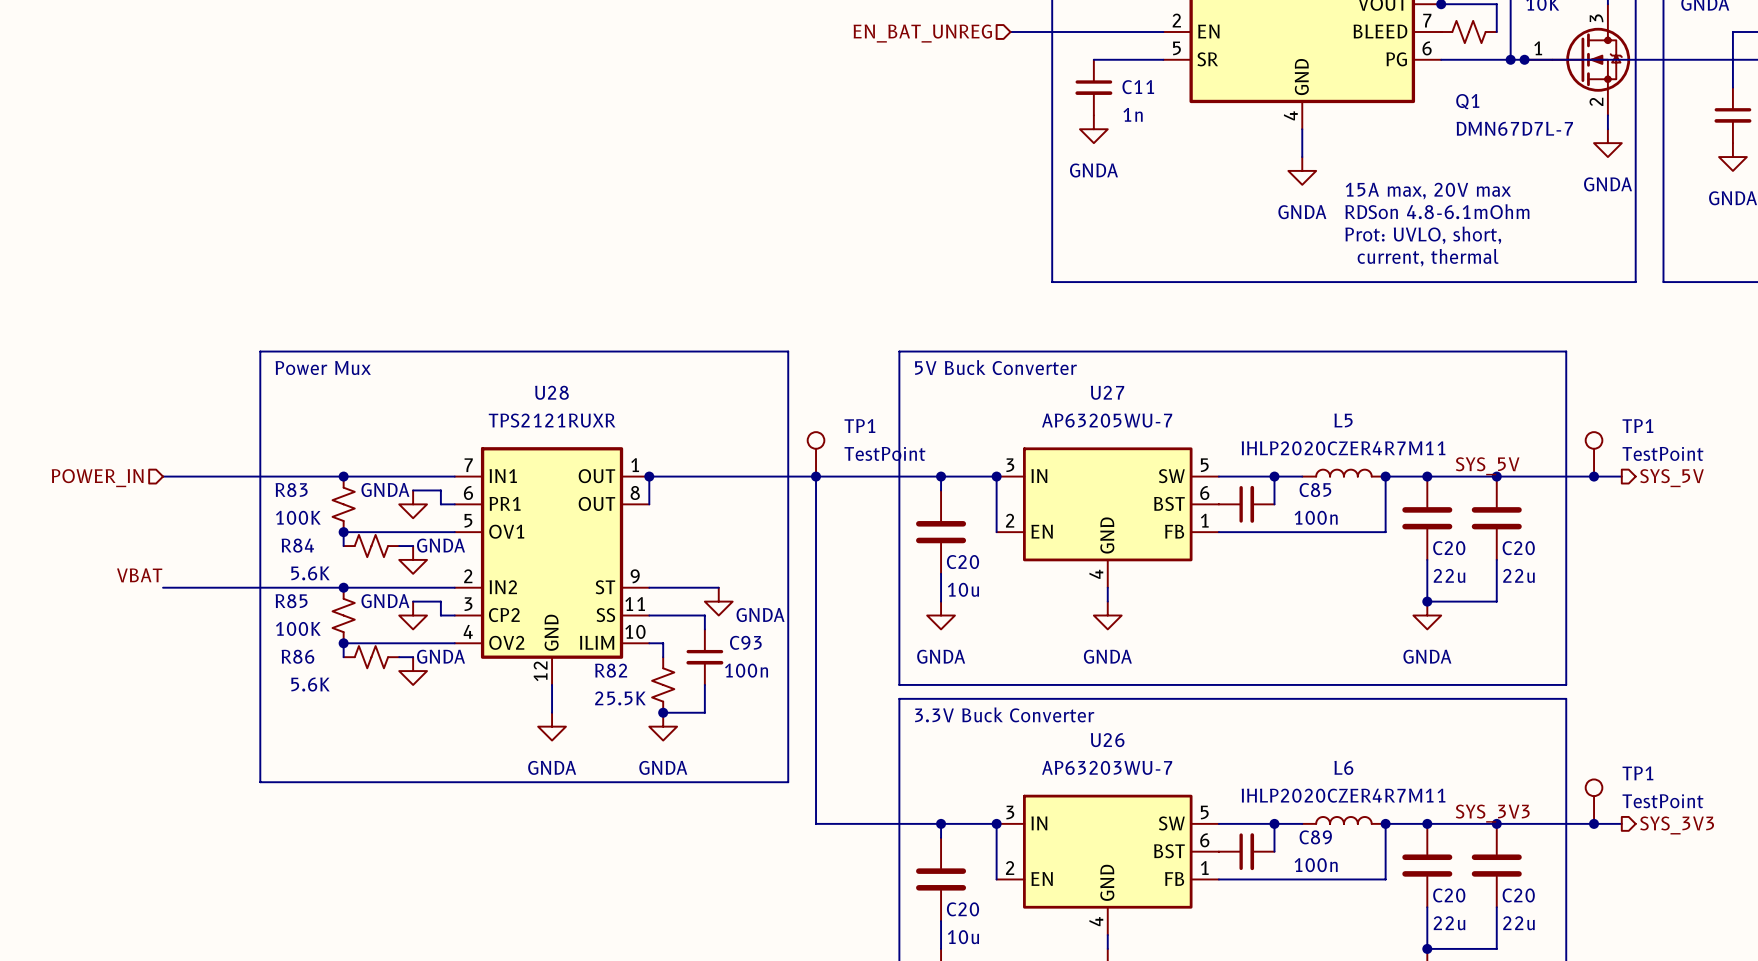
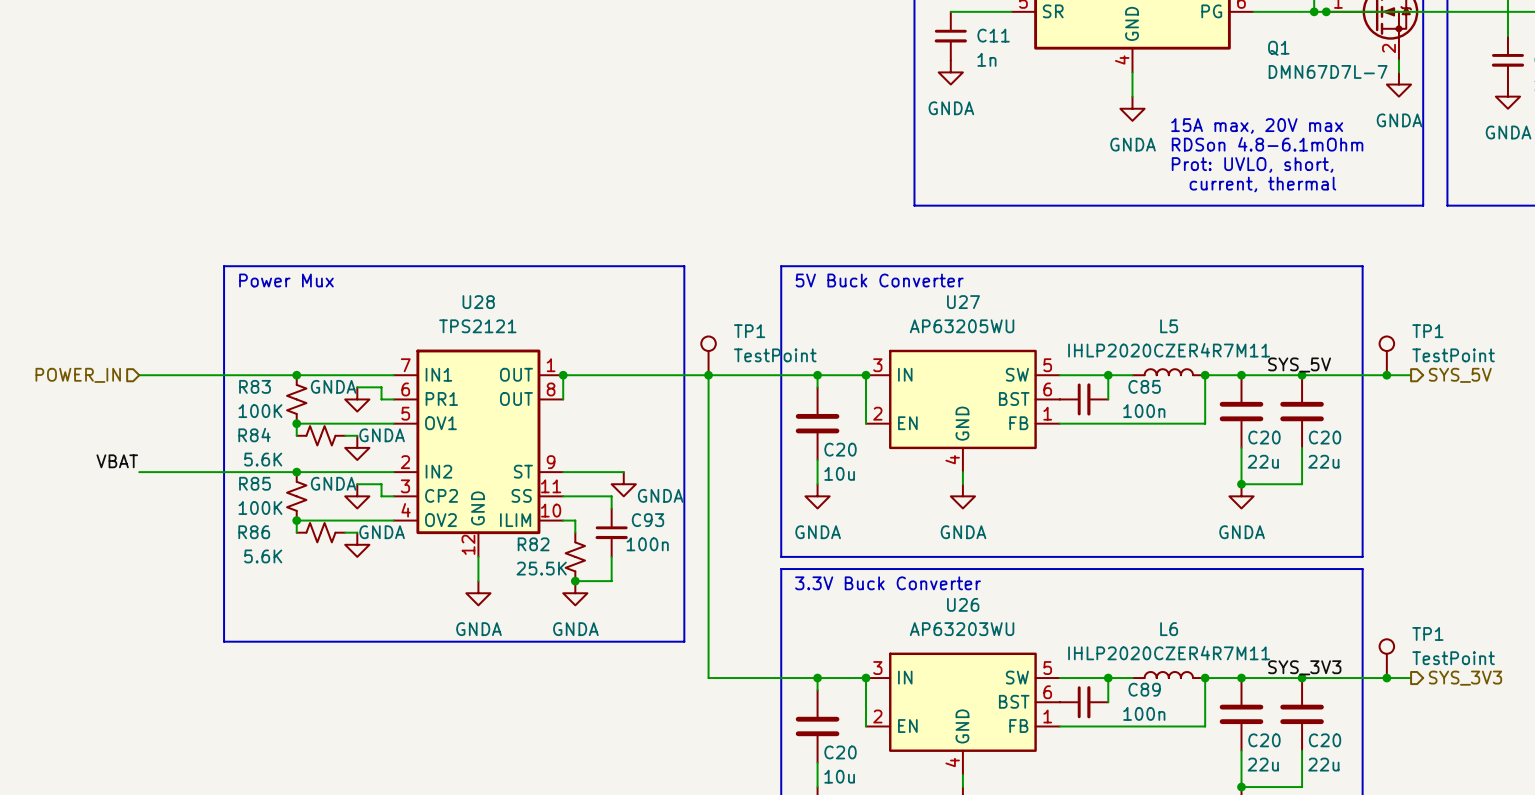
U28 value: TPS2121RUXR (552, 420) -> TPS2121 (477, 326)
U27 value: AP63205WU-7 (1107, 420) -> AP63205WU (962, 326)
U26 value: AP63203WU-7 (1107, 767) -> AP63203WU (962, 629)

